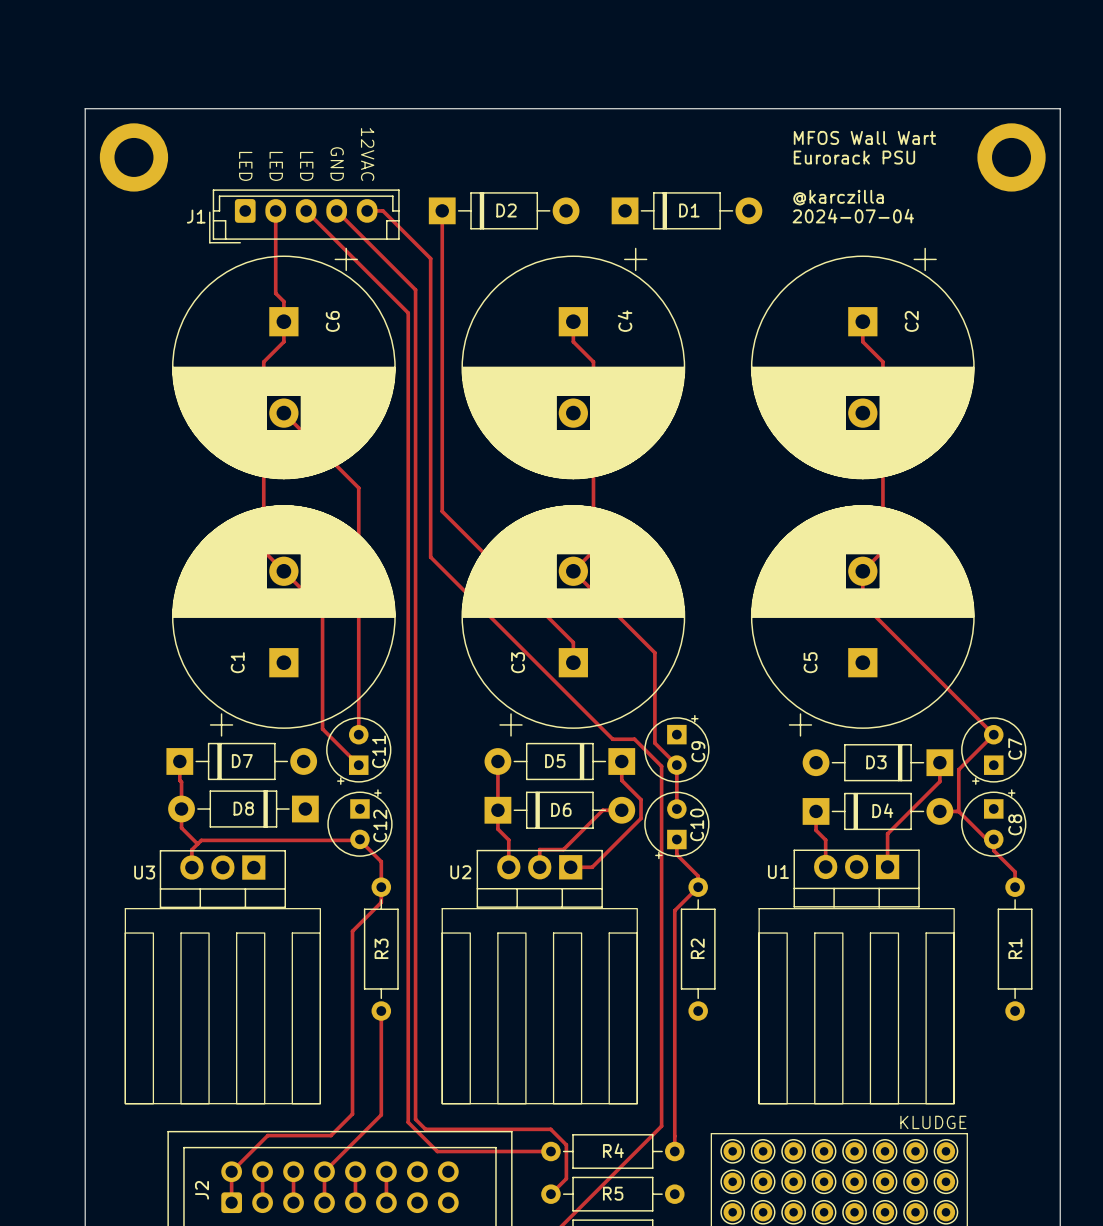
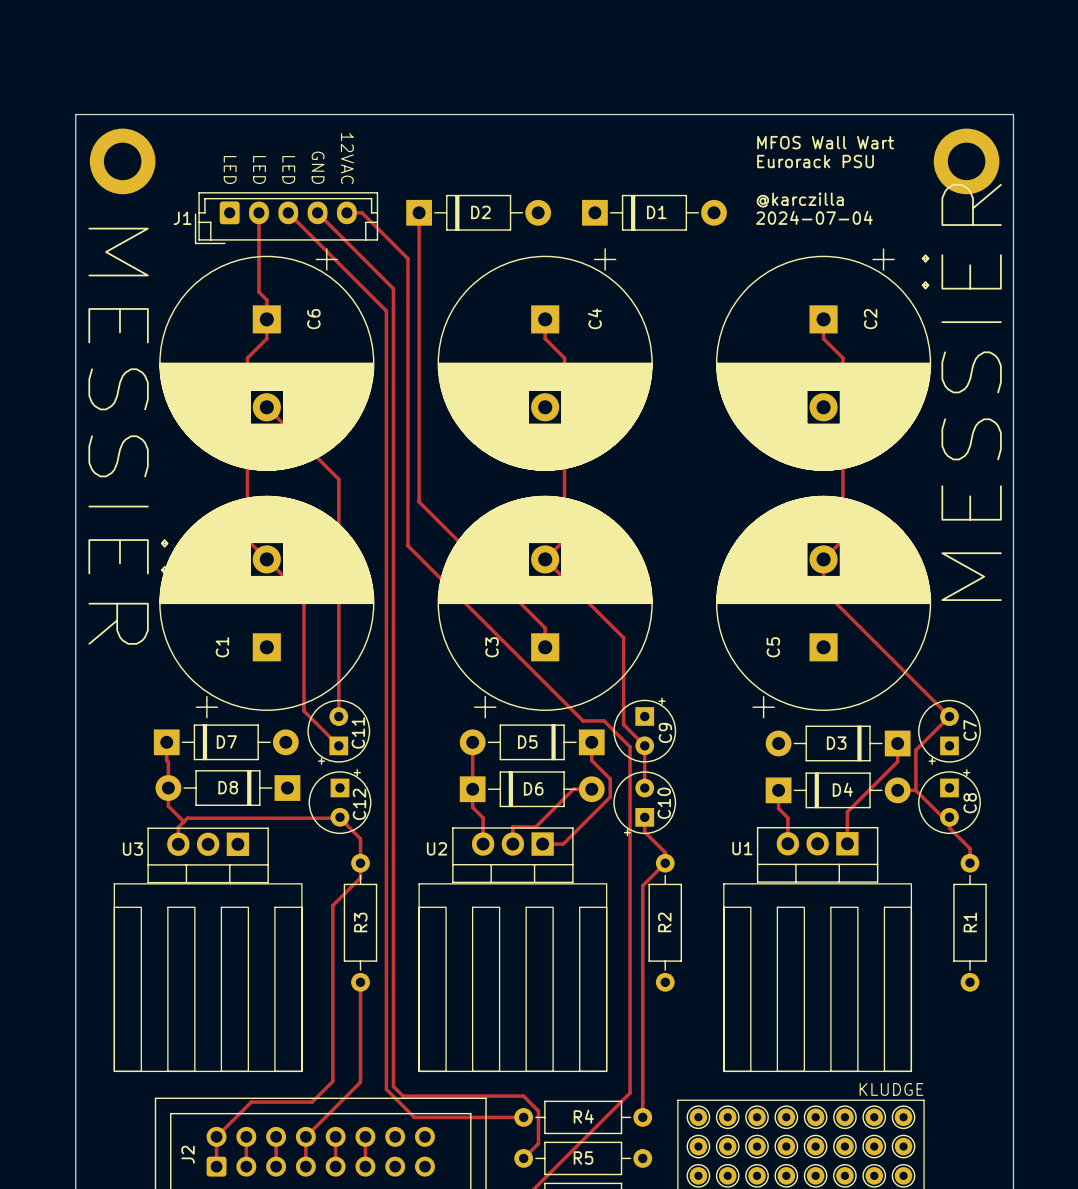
text: none -> MESSIËR (961, 392)
text: none -> MESSIËR (128, 436)

